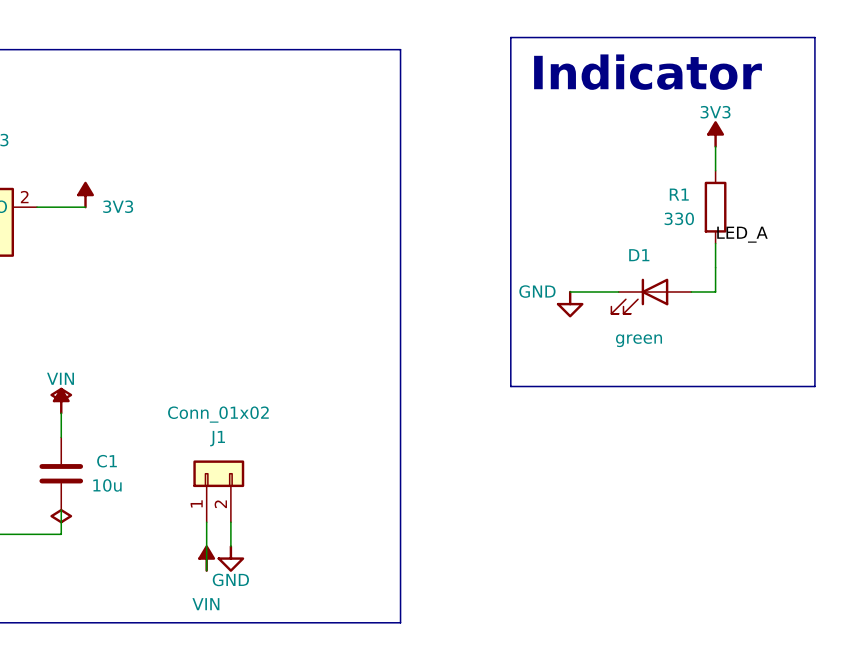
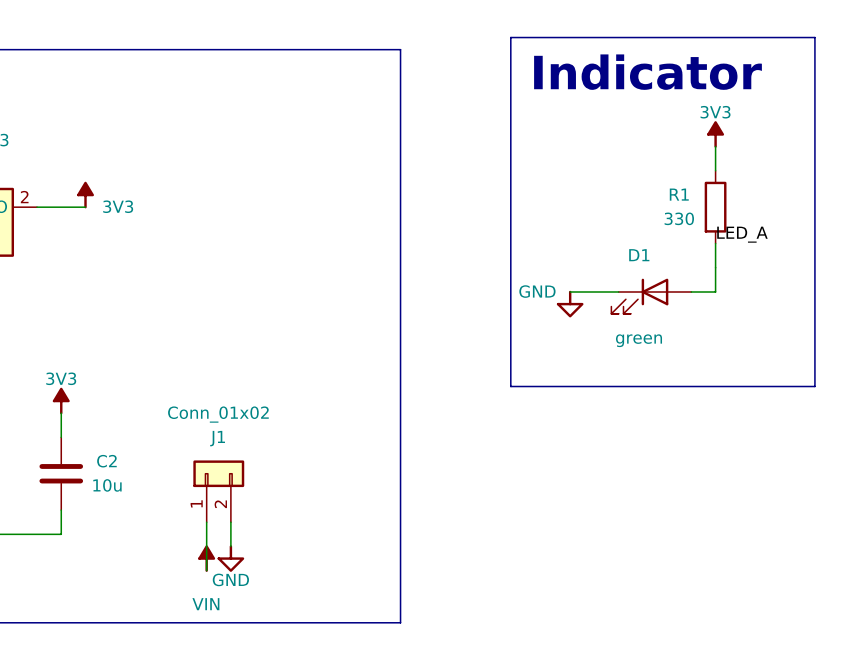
power symbol: (61, 394) -> none
power symbol: VIN (61, 401) -> 3V3 (61, 401)
C1 name: C1 (107, 461) -> C2 (106, 461)
power symbol: (61, 516) -> none

